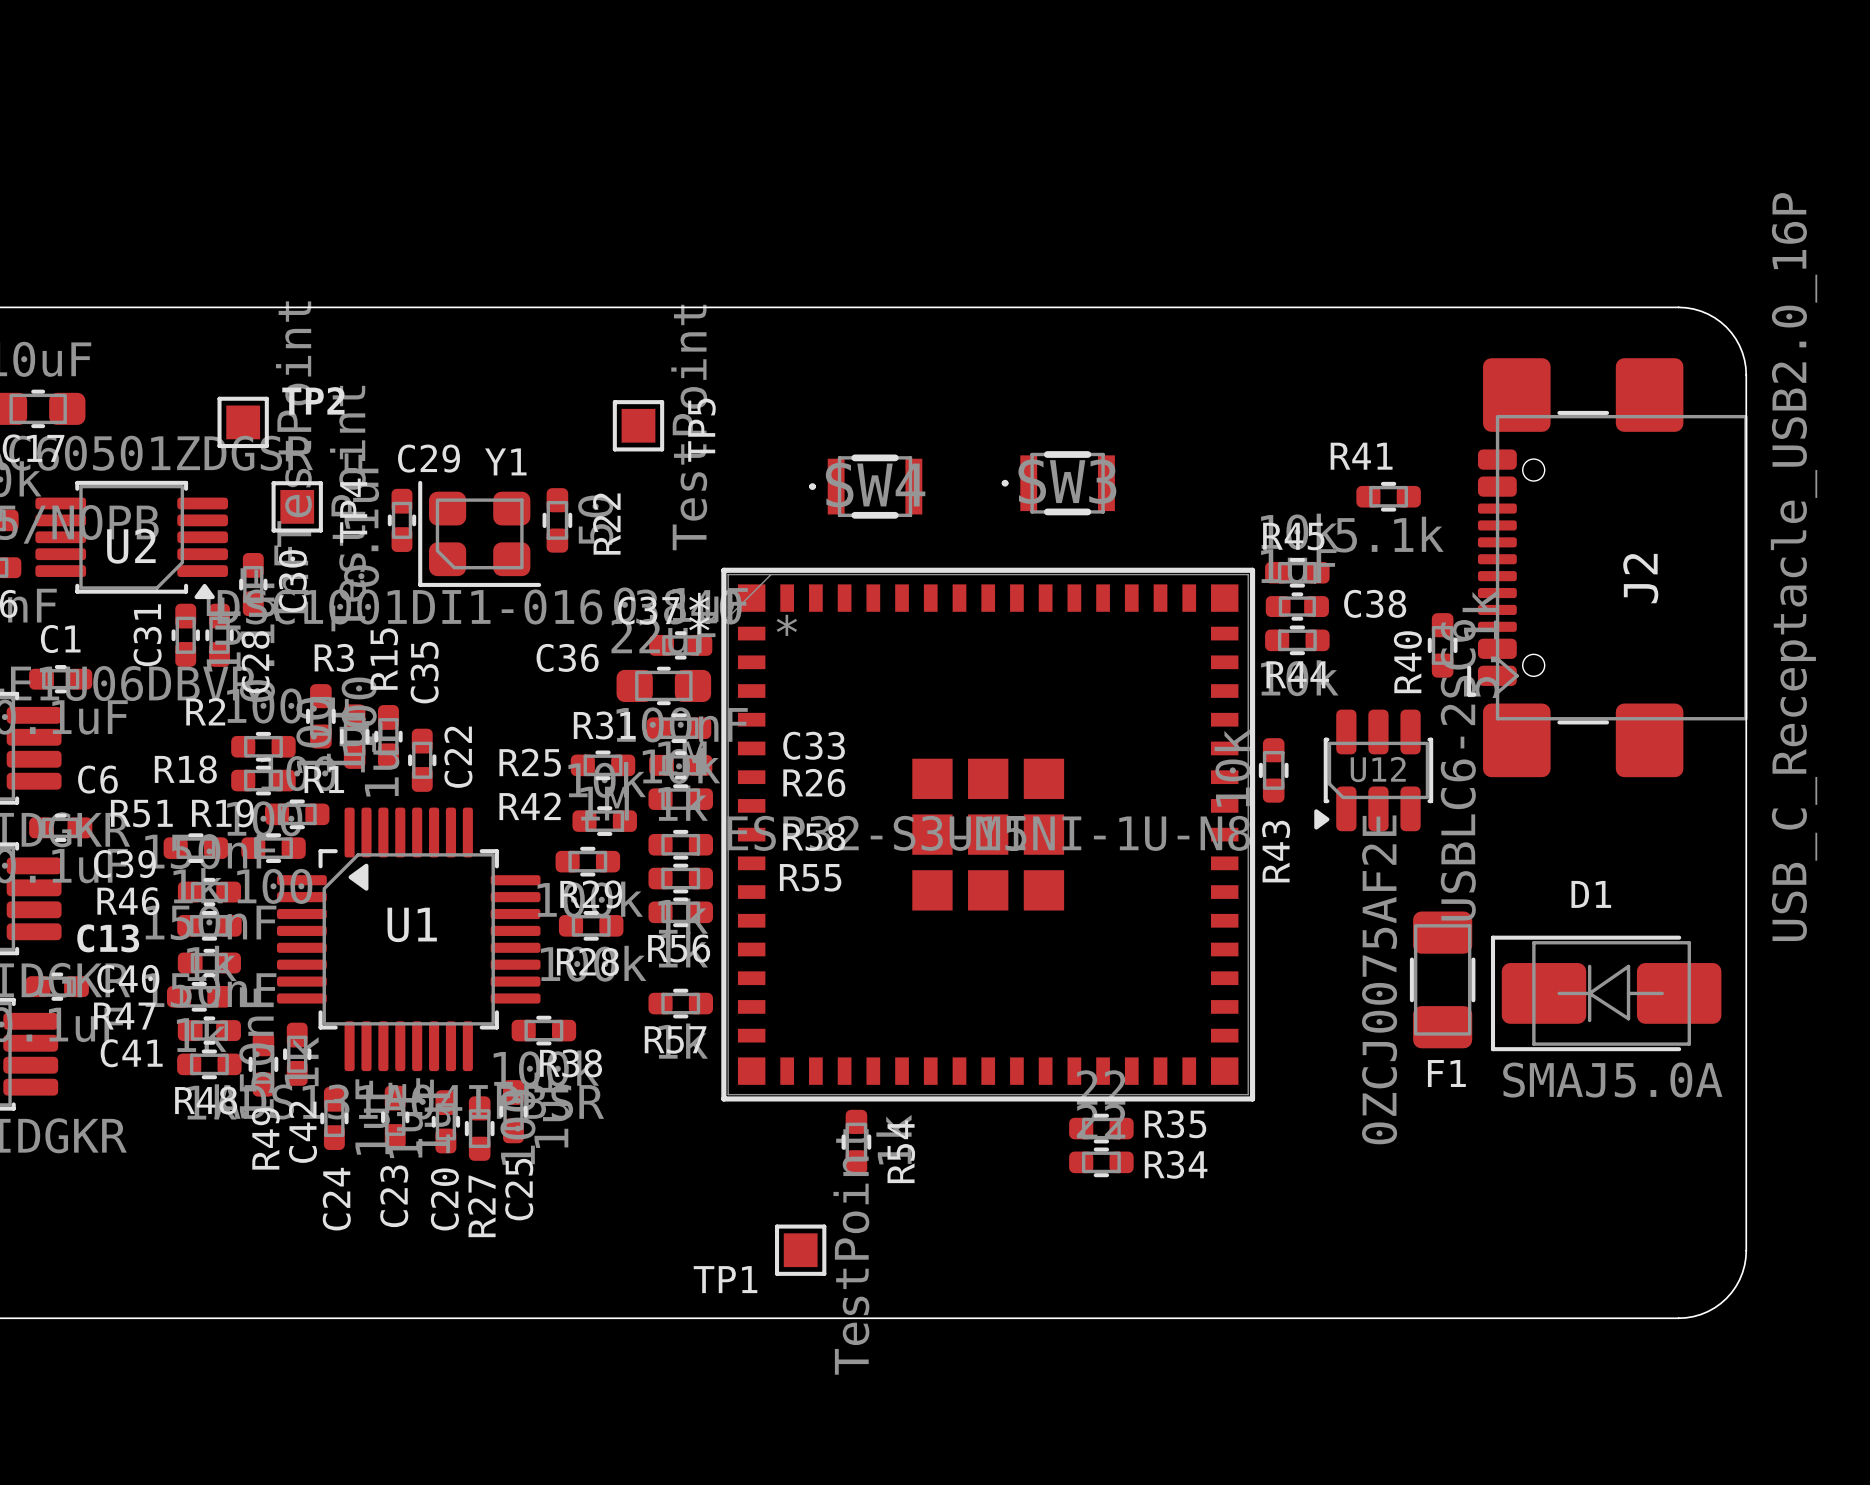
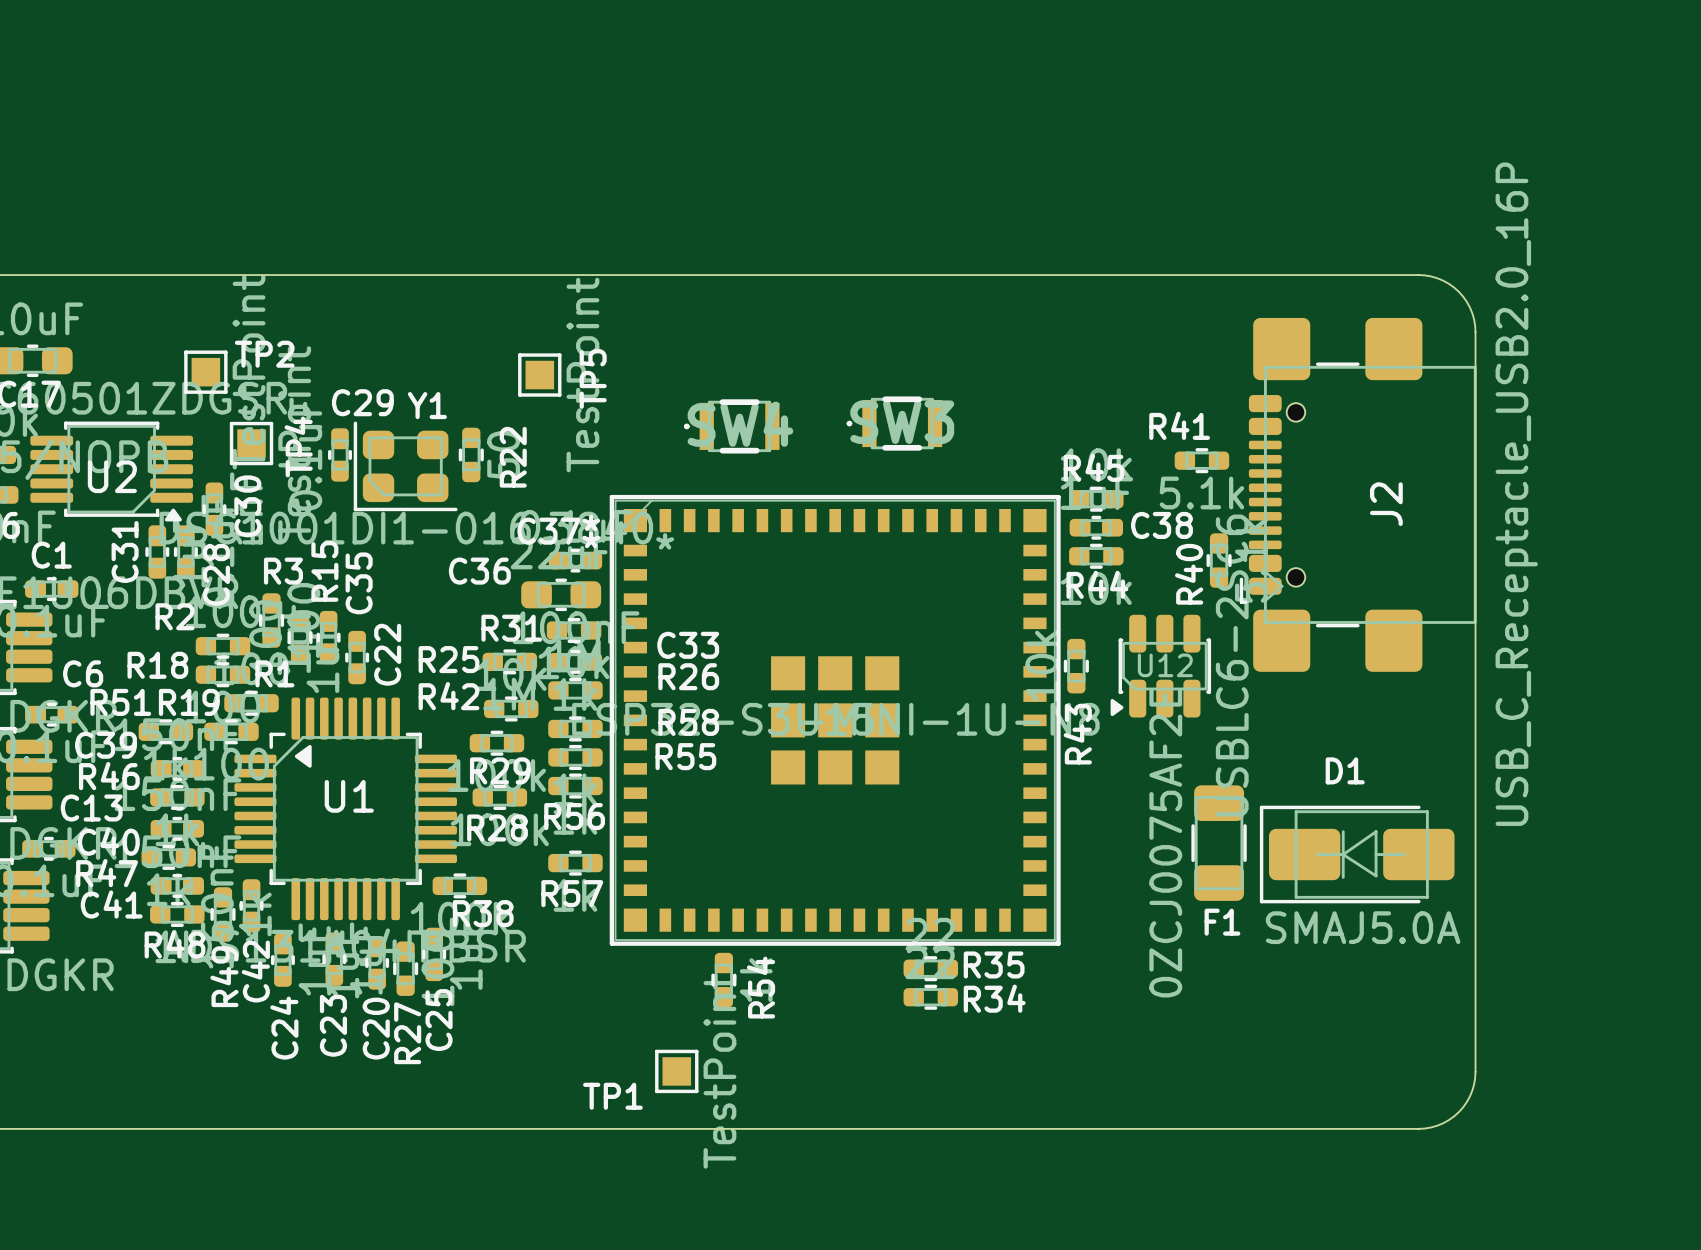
R41 position: (1388, 496) -> (1201, 460)

